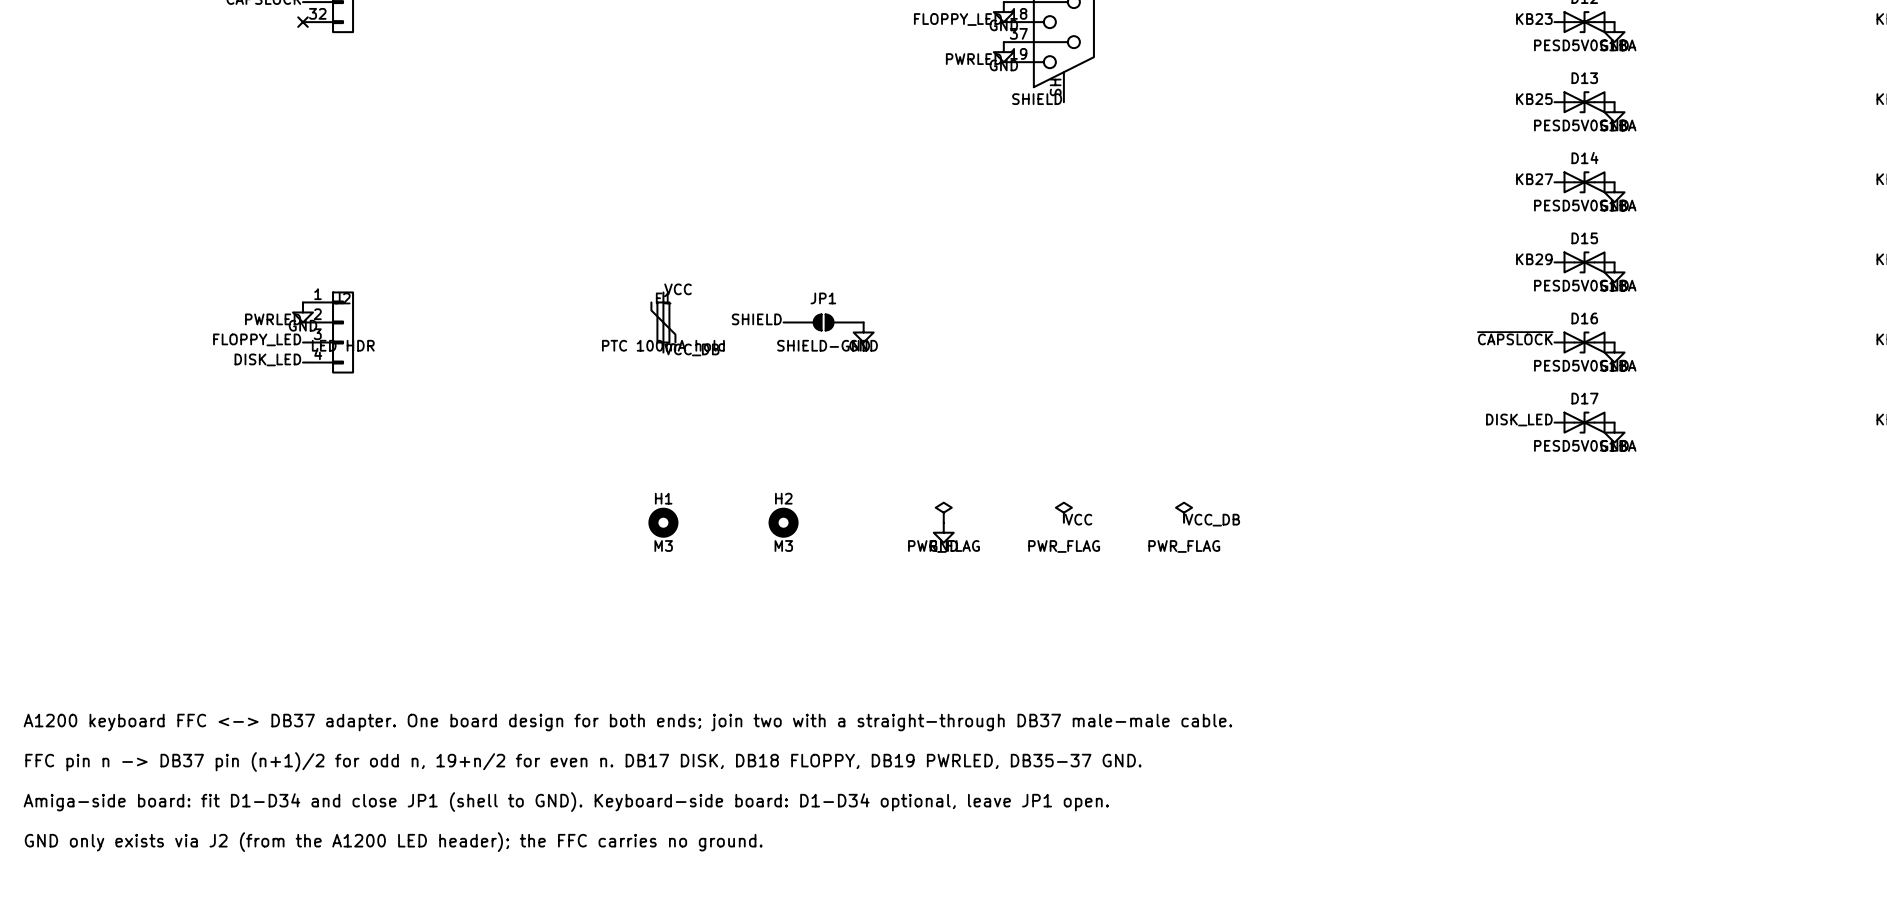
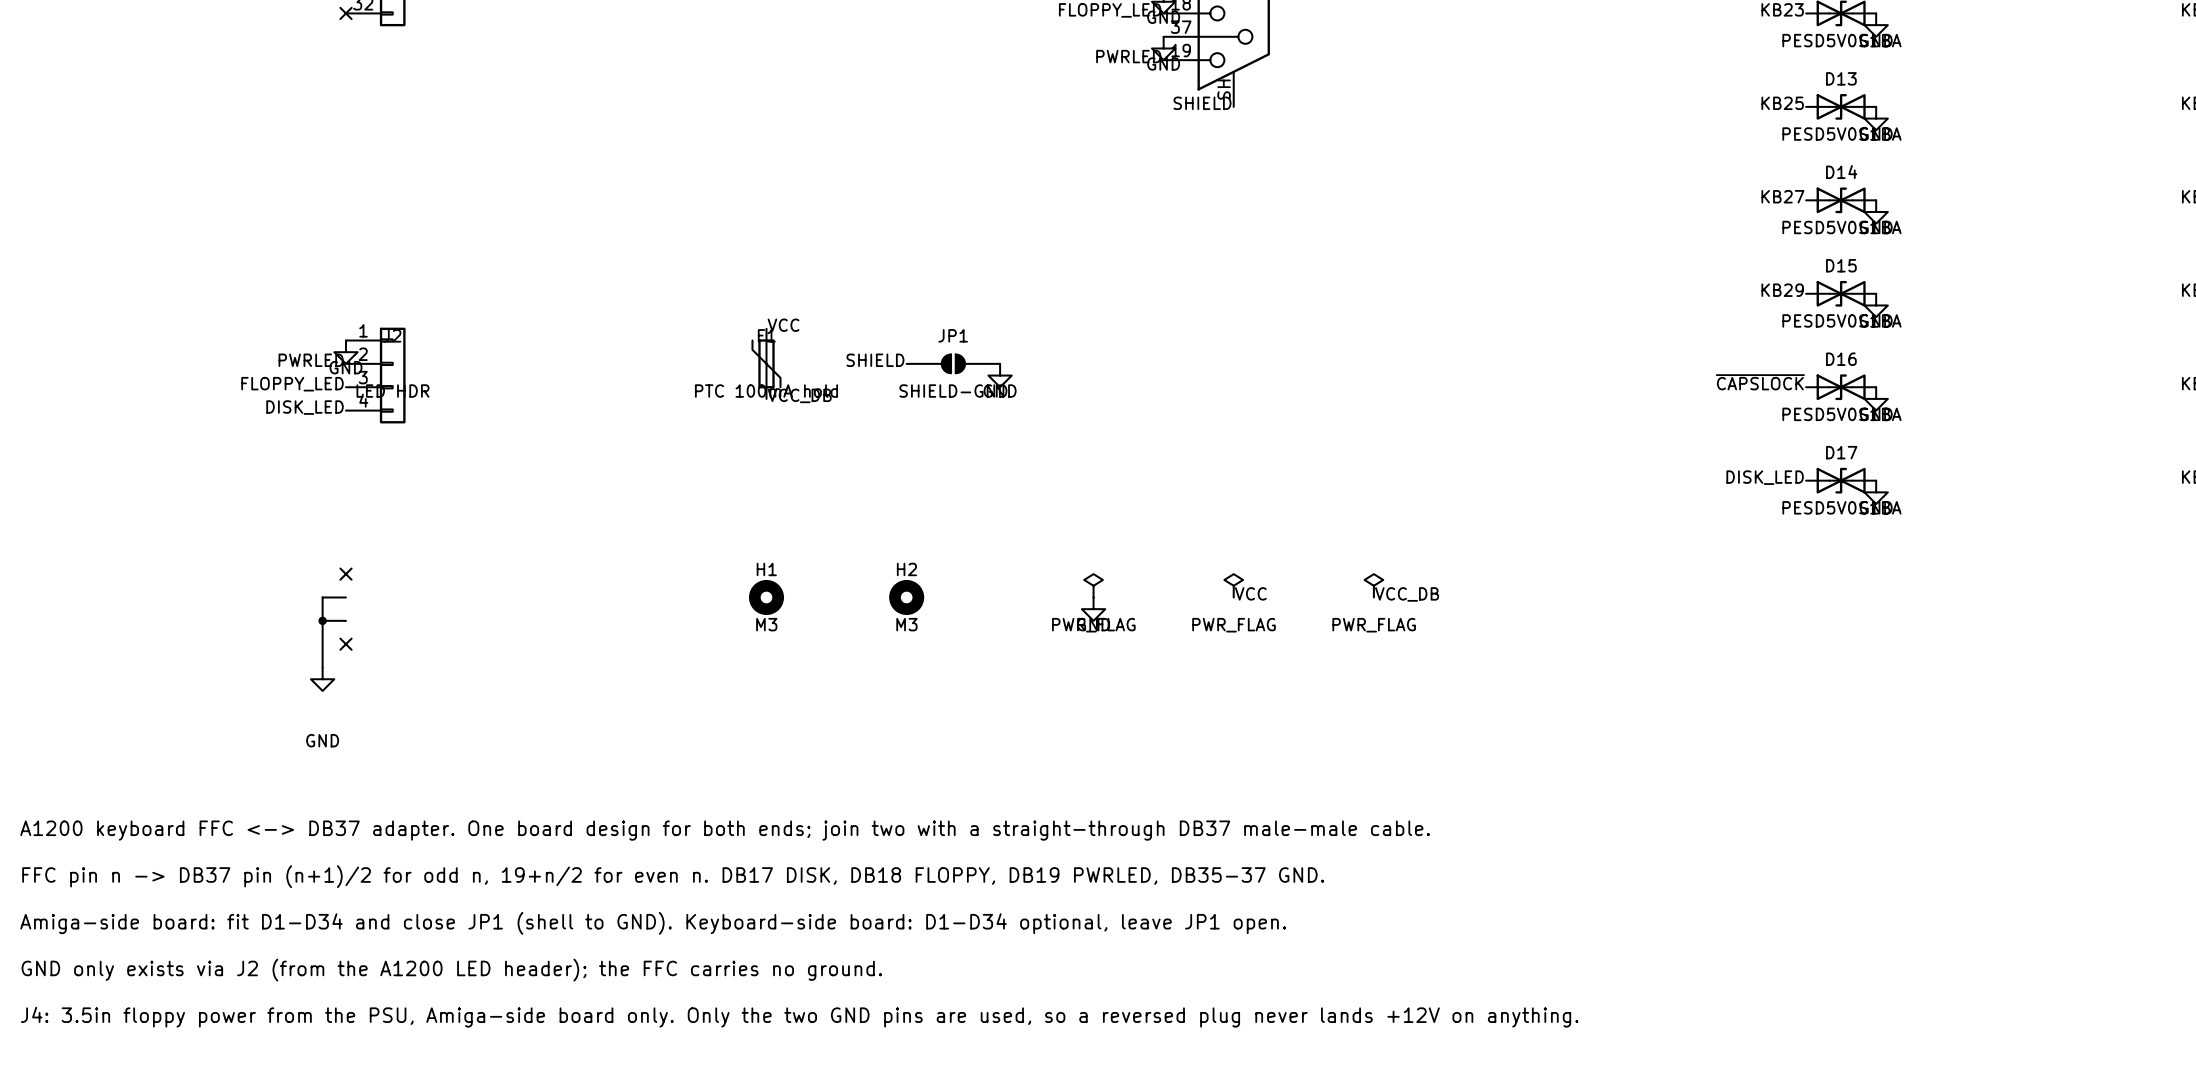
no-connect mark: none -> (345, 574)
wire: none -> (345, 597) (322, 597) (322, 667)
wire: none -> (322, 620) (345, 620)
junction: none -> (322, 620)
no-connect mark: none -> (345, 644)
power symbol: none -> GND (322, 679)
text: none -> J4: 3.5in floppy power from the PSU, Amiga-side board only. Only the two GND pins are used, so a reversed plug never lands +12V on anything. (799, 1017)

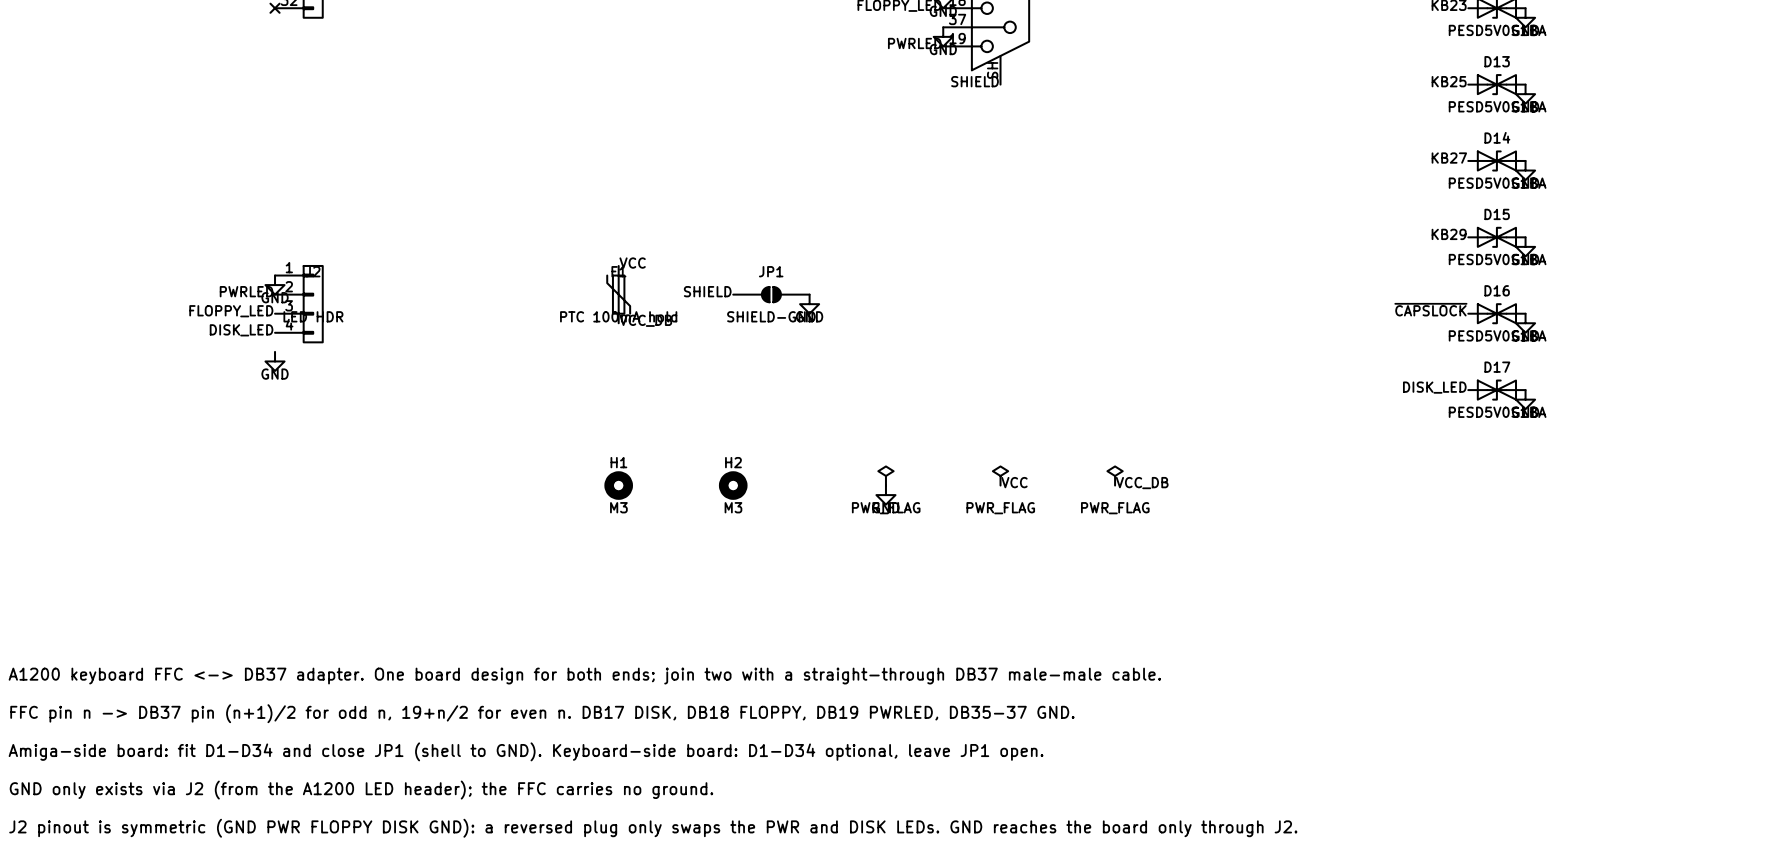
power symbol: none -> GND (275, 361)
no-connect mark: (345, 574) -> none
wire: (345, 597) (322, 597) (322, 667) -> none
wire: (322, 620) (345, 620) -> none
junction: (322, 620) -> none
no-connect mark: (345, 644) -> none
power symbol: GND (322, 679) -> none
text: J4: 3.5in floppy power from the PSU, Amiga-side board only. Only the two GND pins are used, so a reversed plug never lands +12V on anything. (799, 1017) -> J2 pinout is symmetric (GND PWR FLOPPY DISK GND): a reversed plug only swaps the PWR and DISK LEDs. GND reaches the board only through J2. (653, 828)

